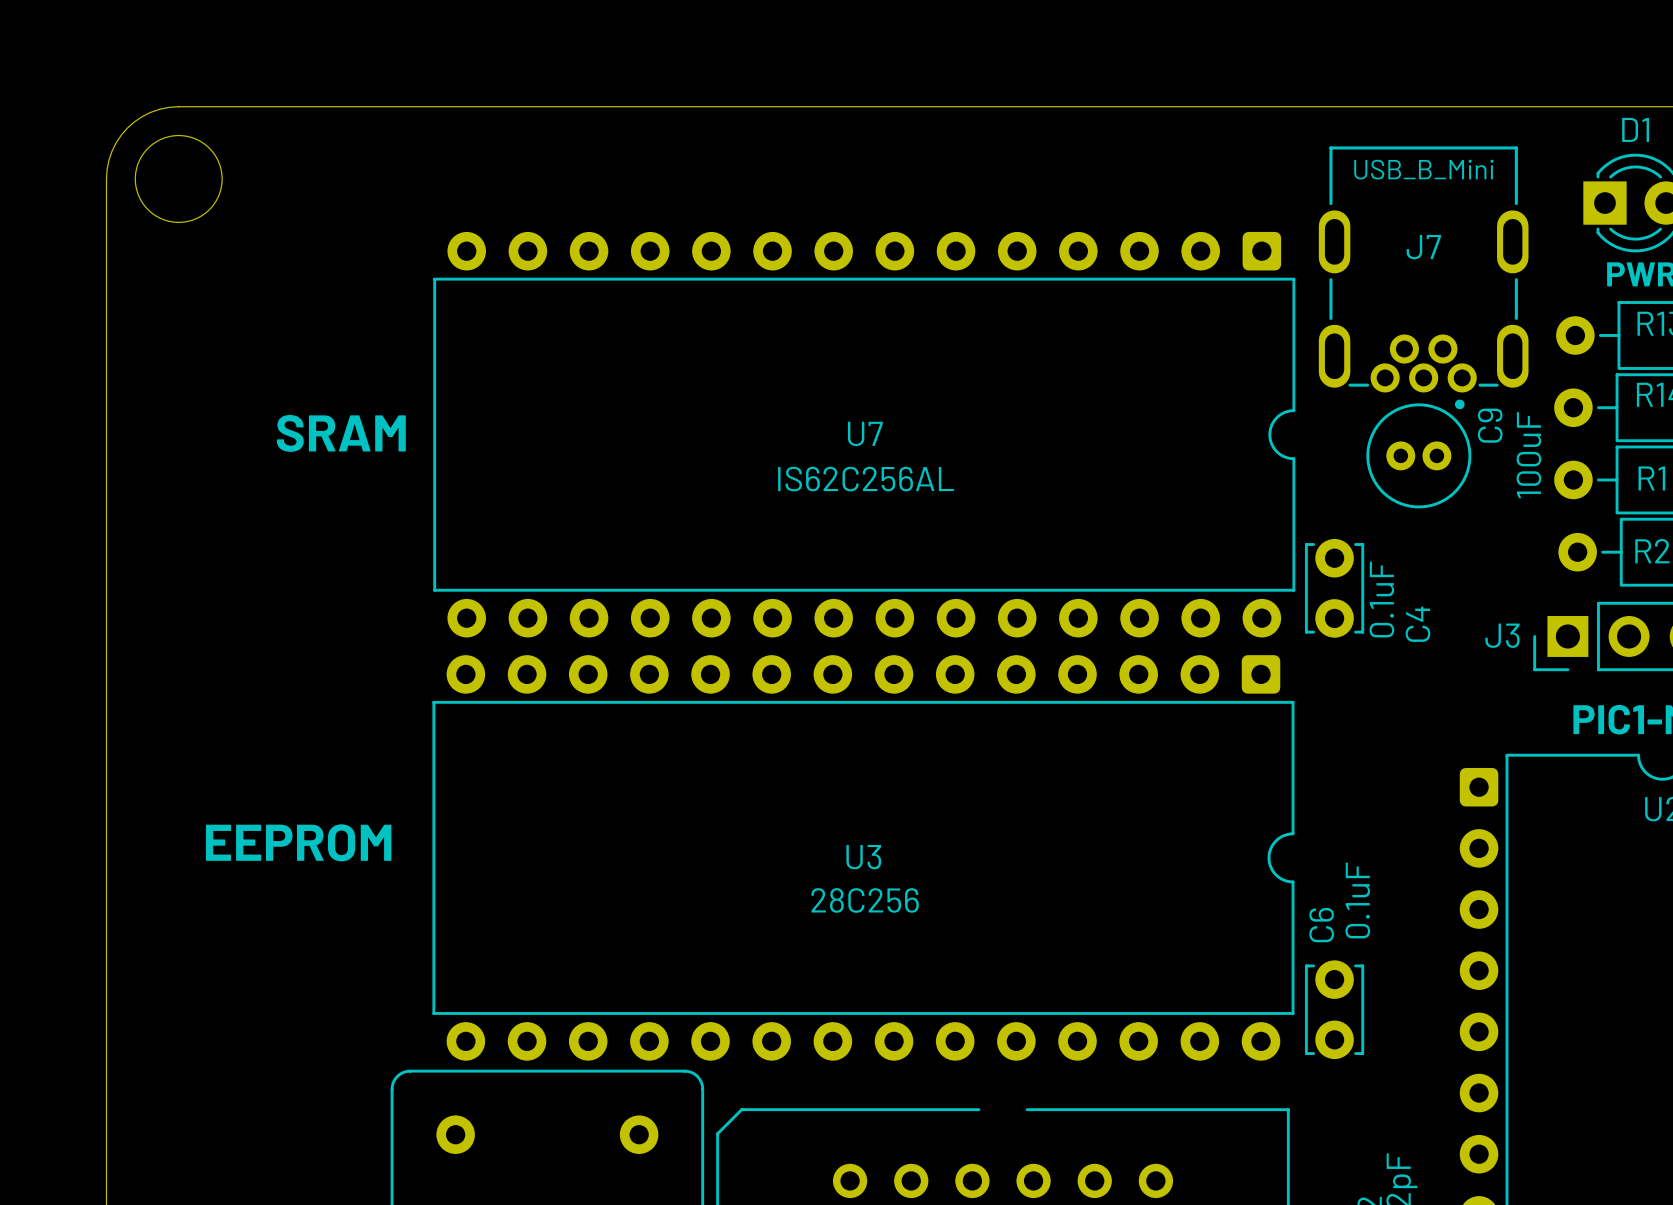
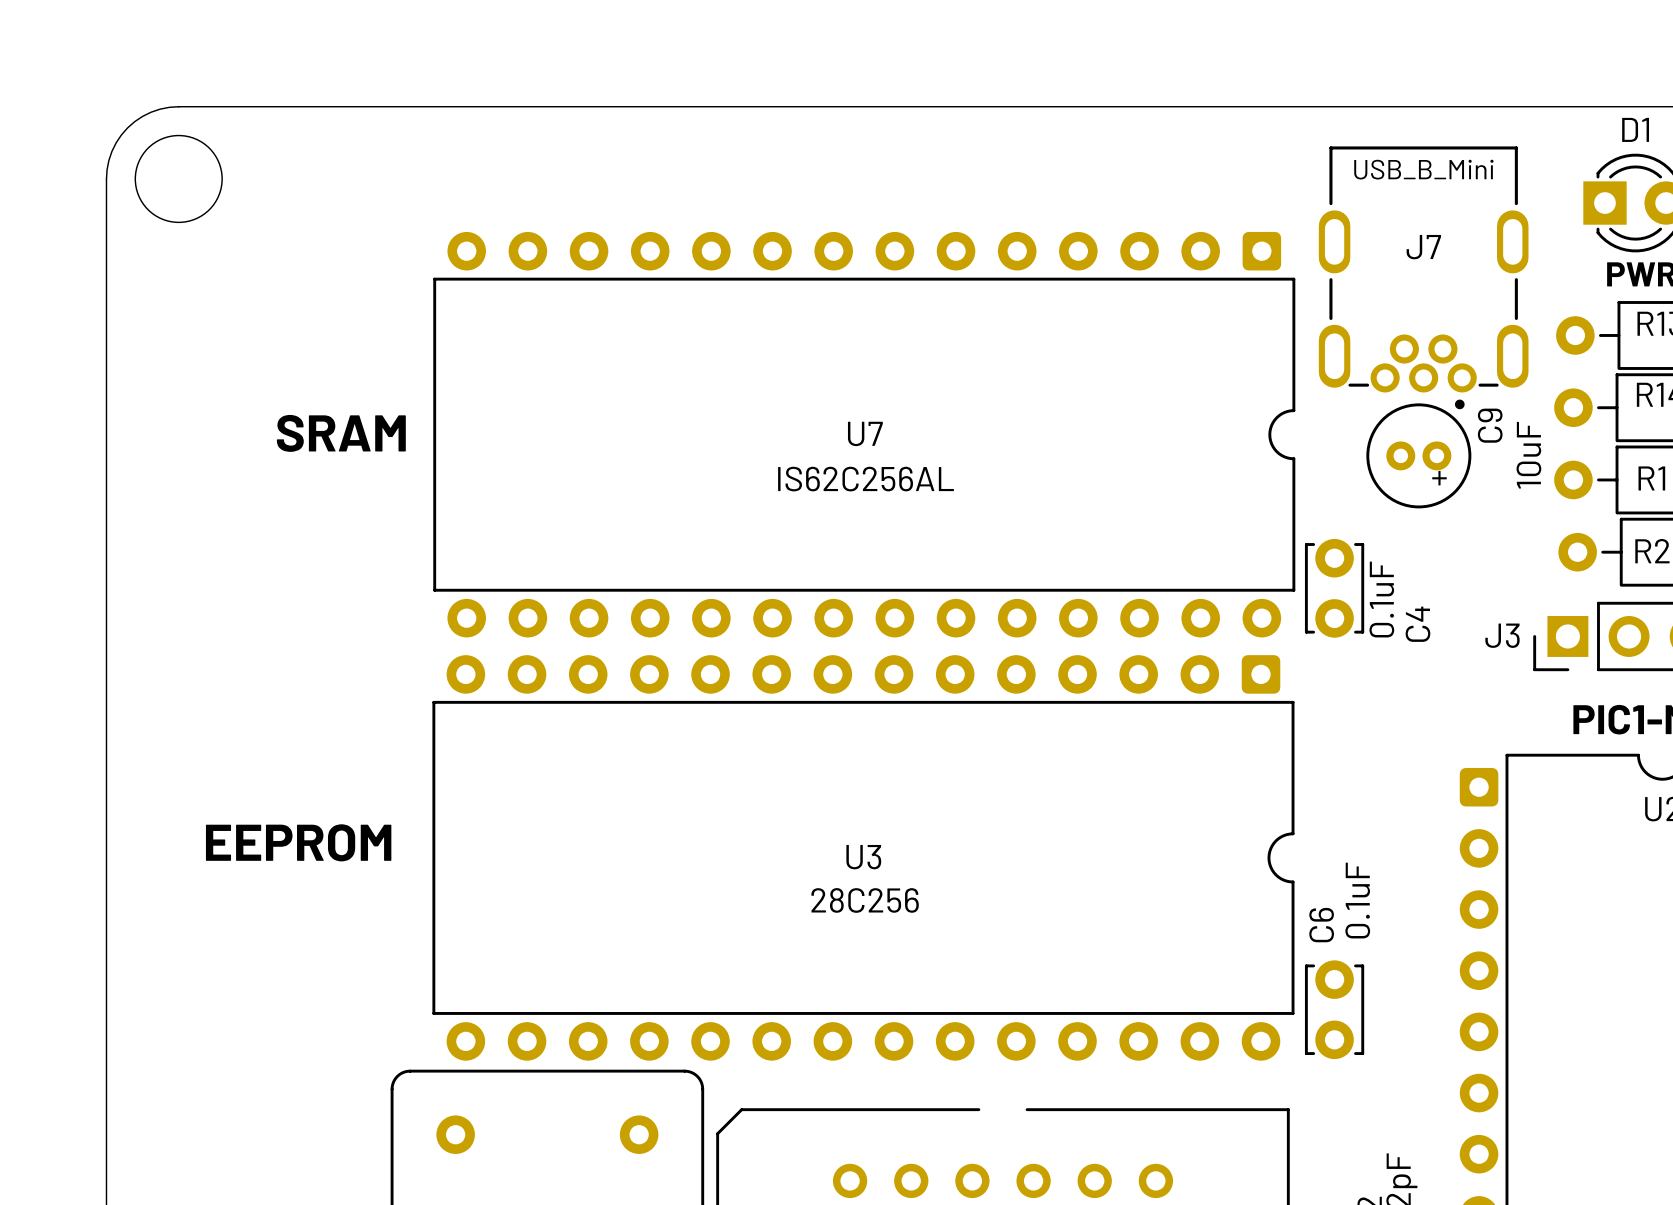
C9 value: 100uF (1528, 455) -> 10uF (1528, 455)
text: none -> + (1439, 478)

